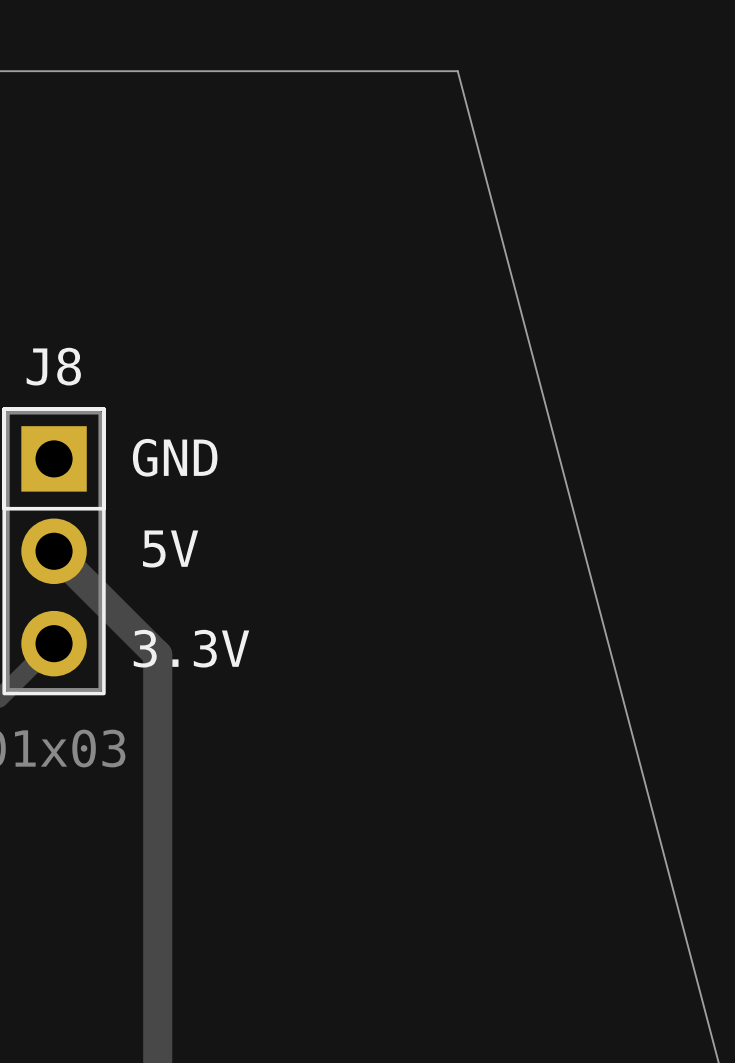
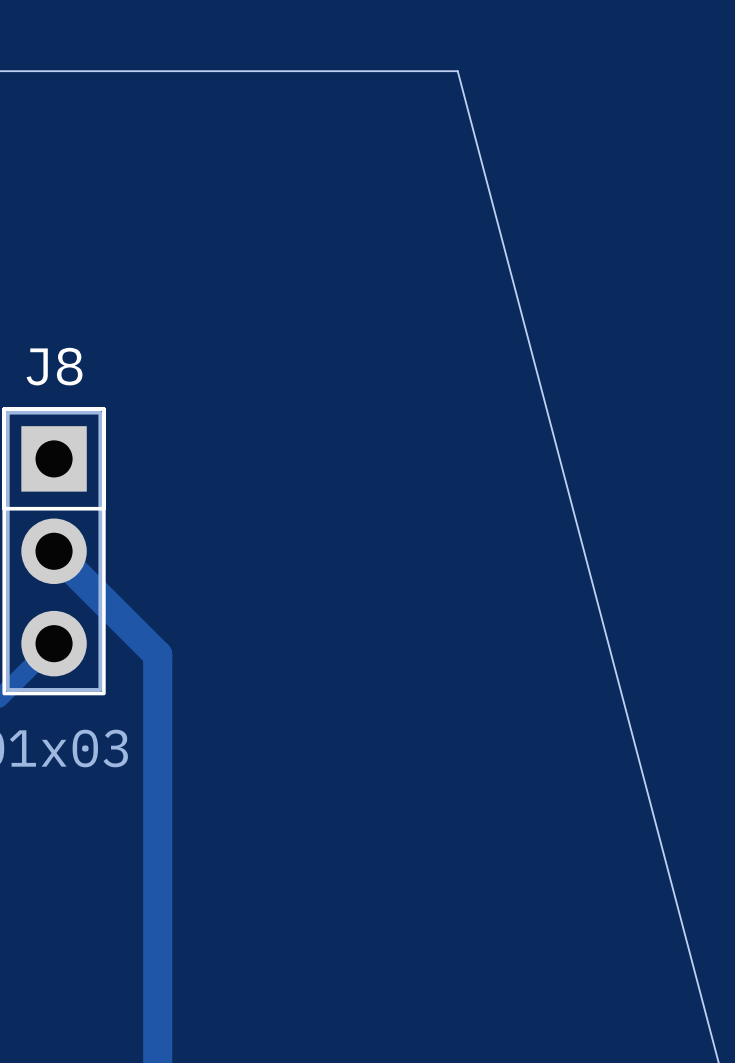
text: GND (175, 457) -> none
text: 5V (170, 549) -> none
text: 3.3V (191, 648) -> none

